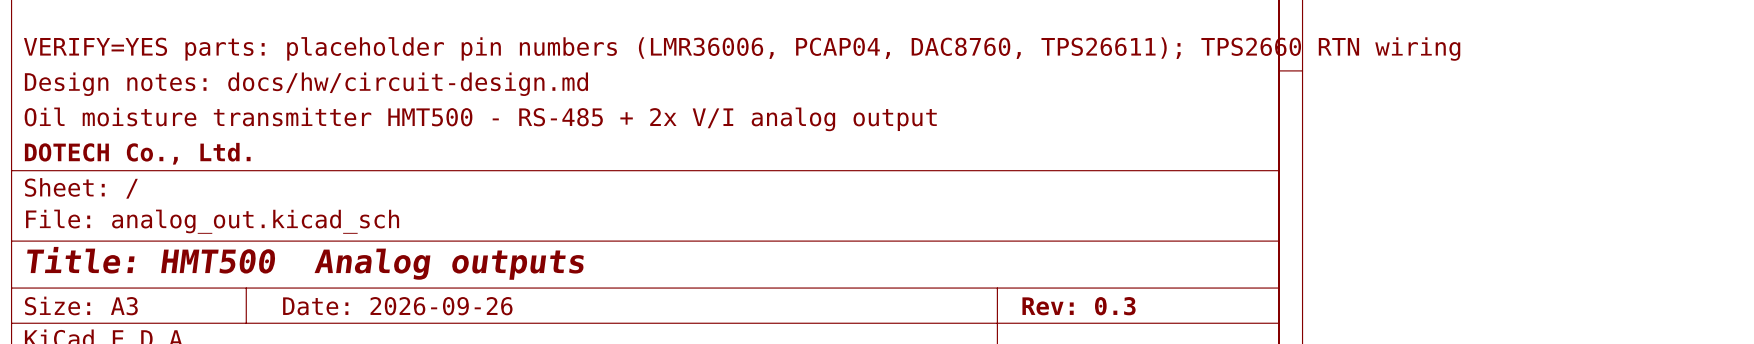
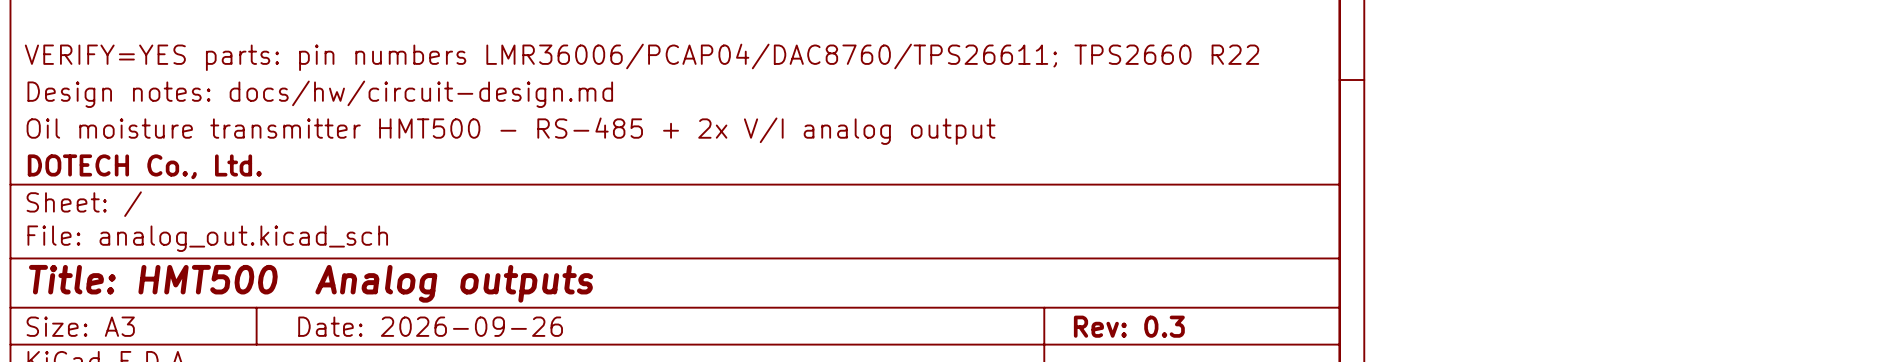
title block: VERIFY=YES parts: placeholder pin numbers (LMR36006, PCAP04, DAC8760, TPS26611); TPS2660 RTN wiring (742, 48) -> VERIFY=YES parts: pin numbers LMR36006/PCAP04/DAC8760/TPS26611; TPS2660 R22 (642, 57)

